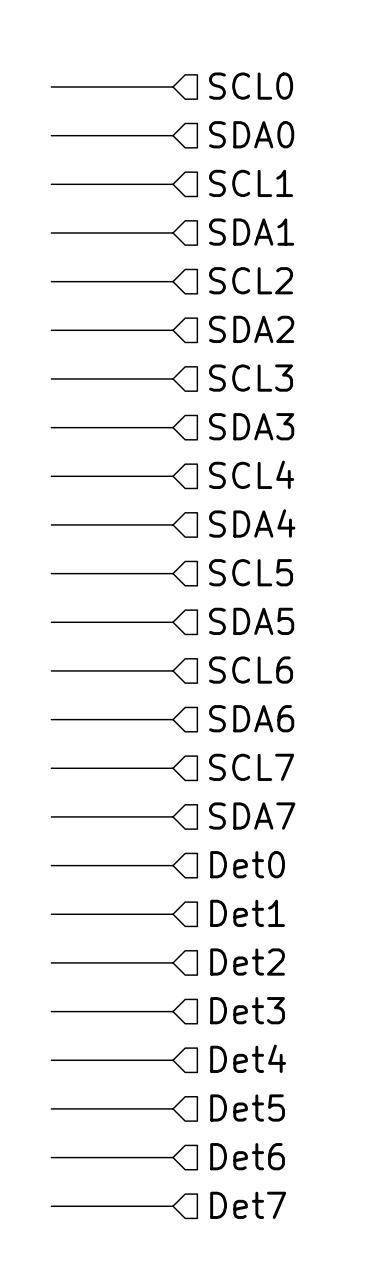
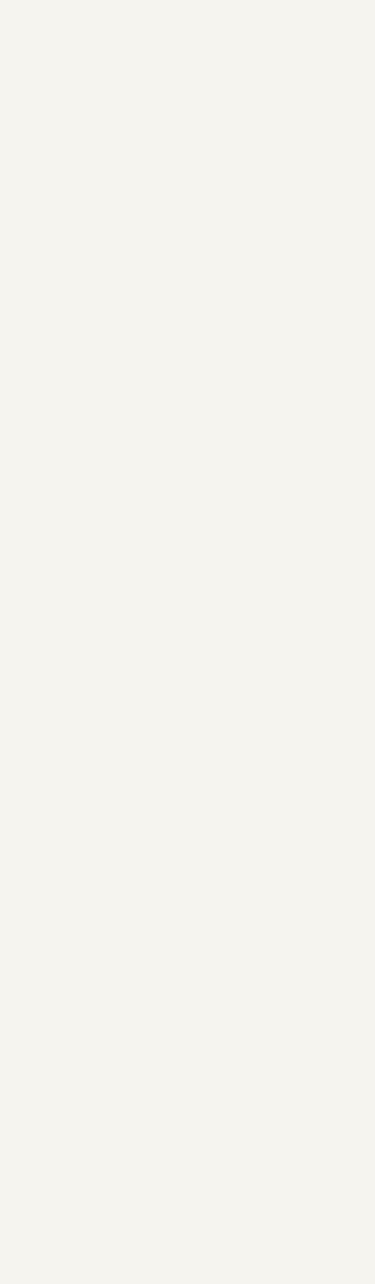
hierarchical label: SCL0 (251, 86) -> none
wire: (51, 87) (173, 87) -> none
hierarchical label: SDA0 (251, 134) -> none
wire: (51, 135) (173, 135) -> none
hierarchical label: SCL1 (251, 183) -> none
wire: (51, 184) (173, 184) -> none
wire: (51, 232) (173, 232) -> none
hierarchical label: SDA1 (251, 232) -> none
hierarchical label: SCL2 (251, 280) -> none
wire: (51, 281) (173, 281) -> none
hierarchical label: SDA2 (251, 329) -> none
wire: (51, 330) (173, 330) -> none
wire: (51, 378) (173, 378) -> none
hierarchical label: SCL3 (251, 378) -> none
hierarchical label: SDA3 (251, 426) -> none
wire: (51, 427) (173, 427) -> none
hierarchical label: SCL4 (251, 474) -> none
wire: (51, 476) (173, 476) -> none
hierarchical label: SDA4 (252, 523) -> none
wire: (51, 524) (173, 524) -> none
hierarchical label: SCL5 (251, 572) -> none
wire: (51, 573) (173, 573) -> none
hierarchical label: SDA5 (251, 621) -> none
wire: (51, 622) (173, 622) -> none
wire: (51, 670) (173, 670) -> none
hierarchical label: SCL6 (251, 670) -> none
hierarchical label: SDA6 (251, 718) -> none
wire: (51, 719) (173, 719) -> none
hierarchical label: SCL7 (251, 767) -> none
wire: (51, 768) (173, 768) -> none
wire: (51, 816) (173, 816) -> none
hierarchical label: SDA7 (252, 816) -> none
hierarchical label: Det0 (247, 864) -> none
wire: (51, 865) (173, 865) -> none
hierarchical label: Det1 (247, 913) -> none
wire: (51, 914) (173, 914) -> none
wire: (51, 962) (173, 962) -> none
hierarchical label: Det2 (247, 962) -> none
hierarchical label: Det3 (247, 1010) -> none
wire: (51, 1011) (173, 1011) -> none
hierarchical label: Det4 (248, 1058) -> none
wire: (51, 1060) (173, 1060) -> none
wire: (51, 1108) (173, 1108) -> none
hierarchical label: Det5 (247, 1108) -> none
hierarchical label: Det6 (247, 1156) -> none
wire: (51, 1157) (173, 1157) -> none
hierarchical label: Det7 (248, 1205) -> none
wire: (51, 1206) (173, 1206) -> none

